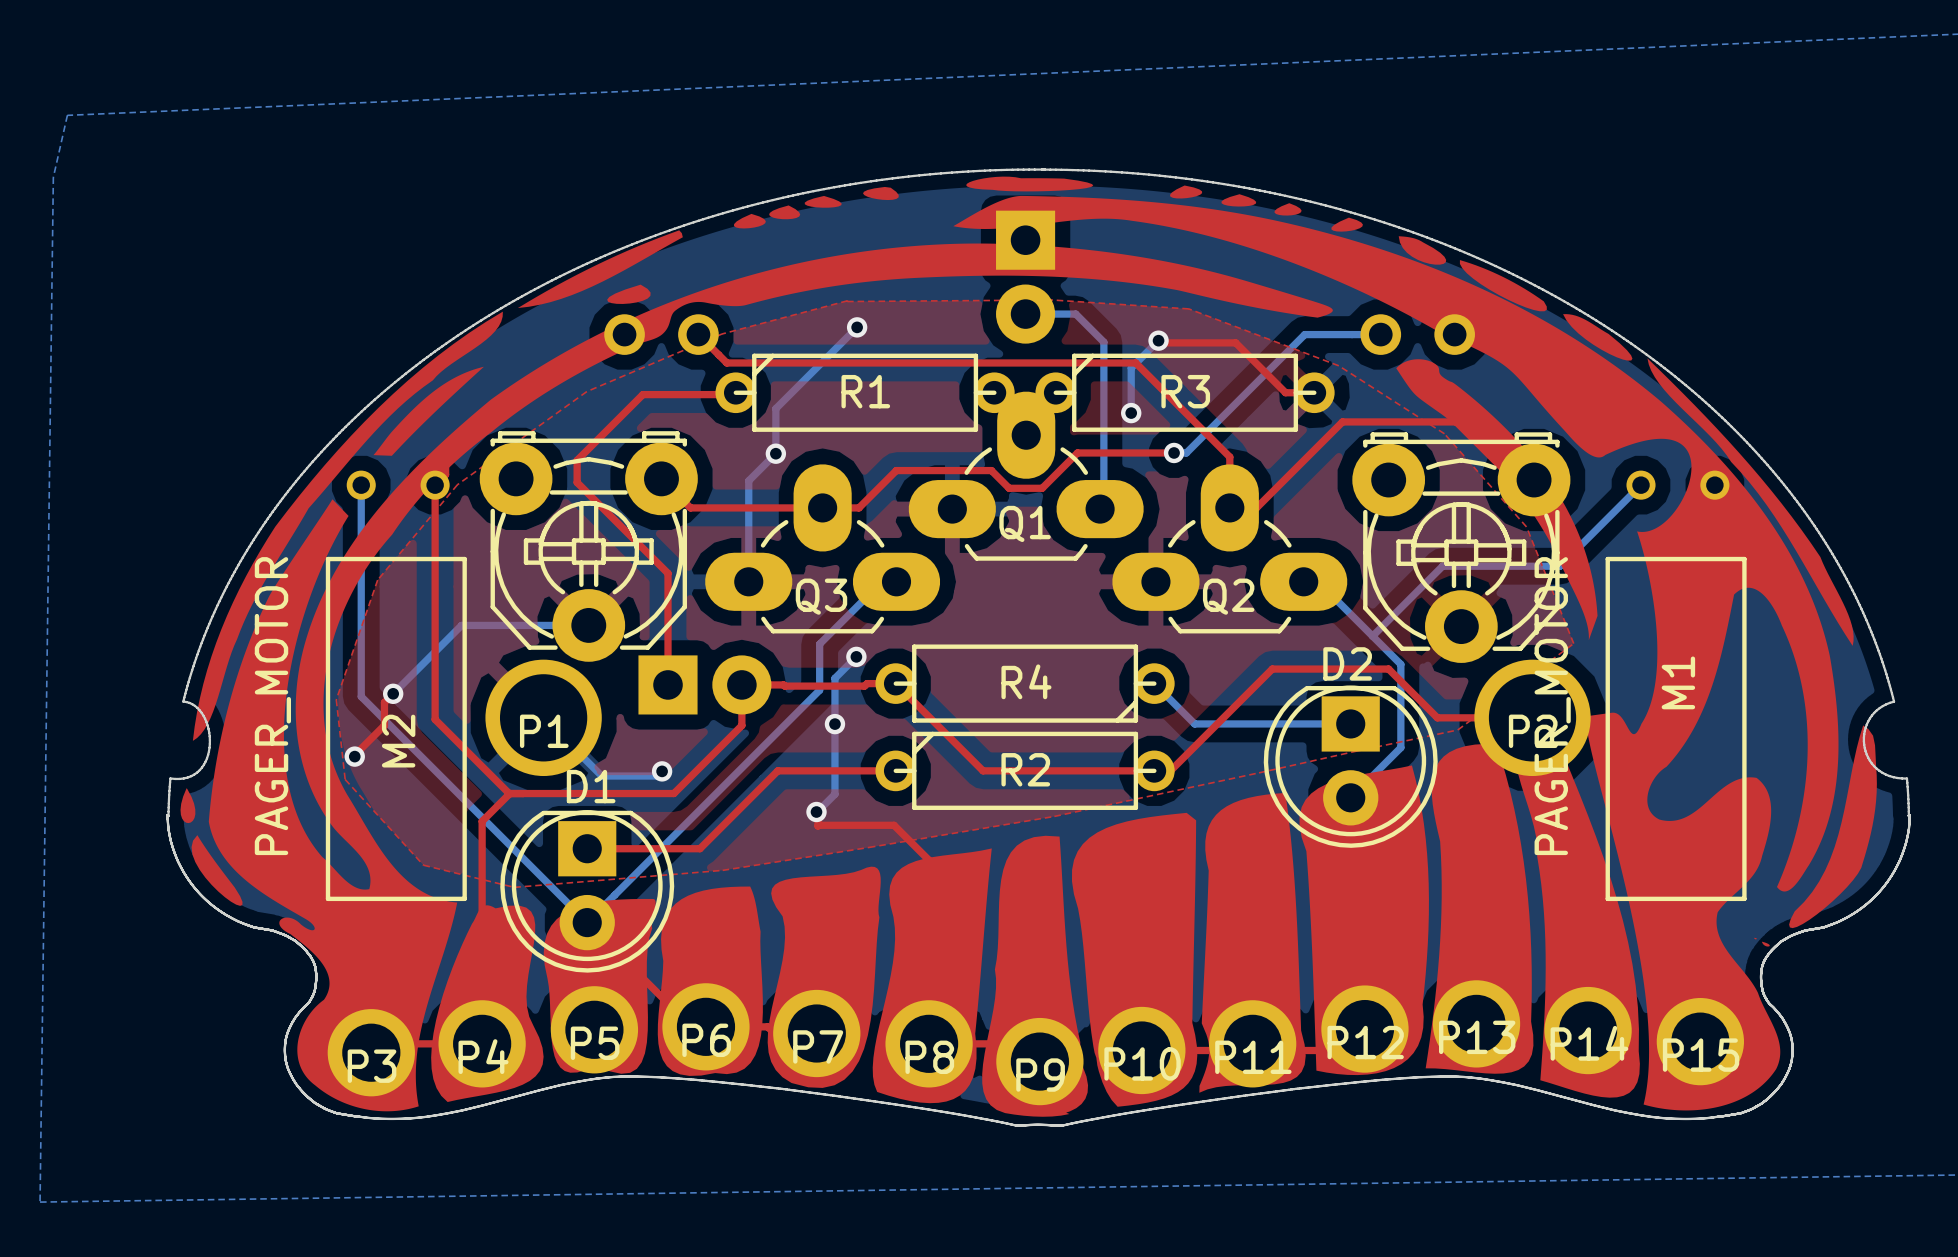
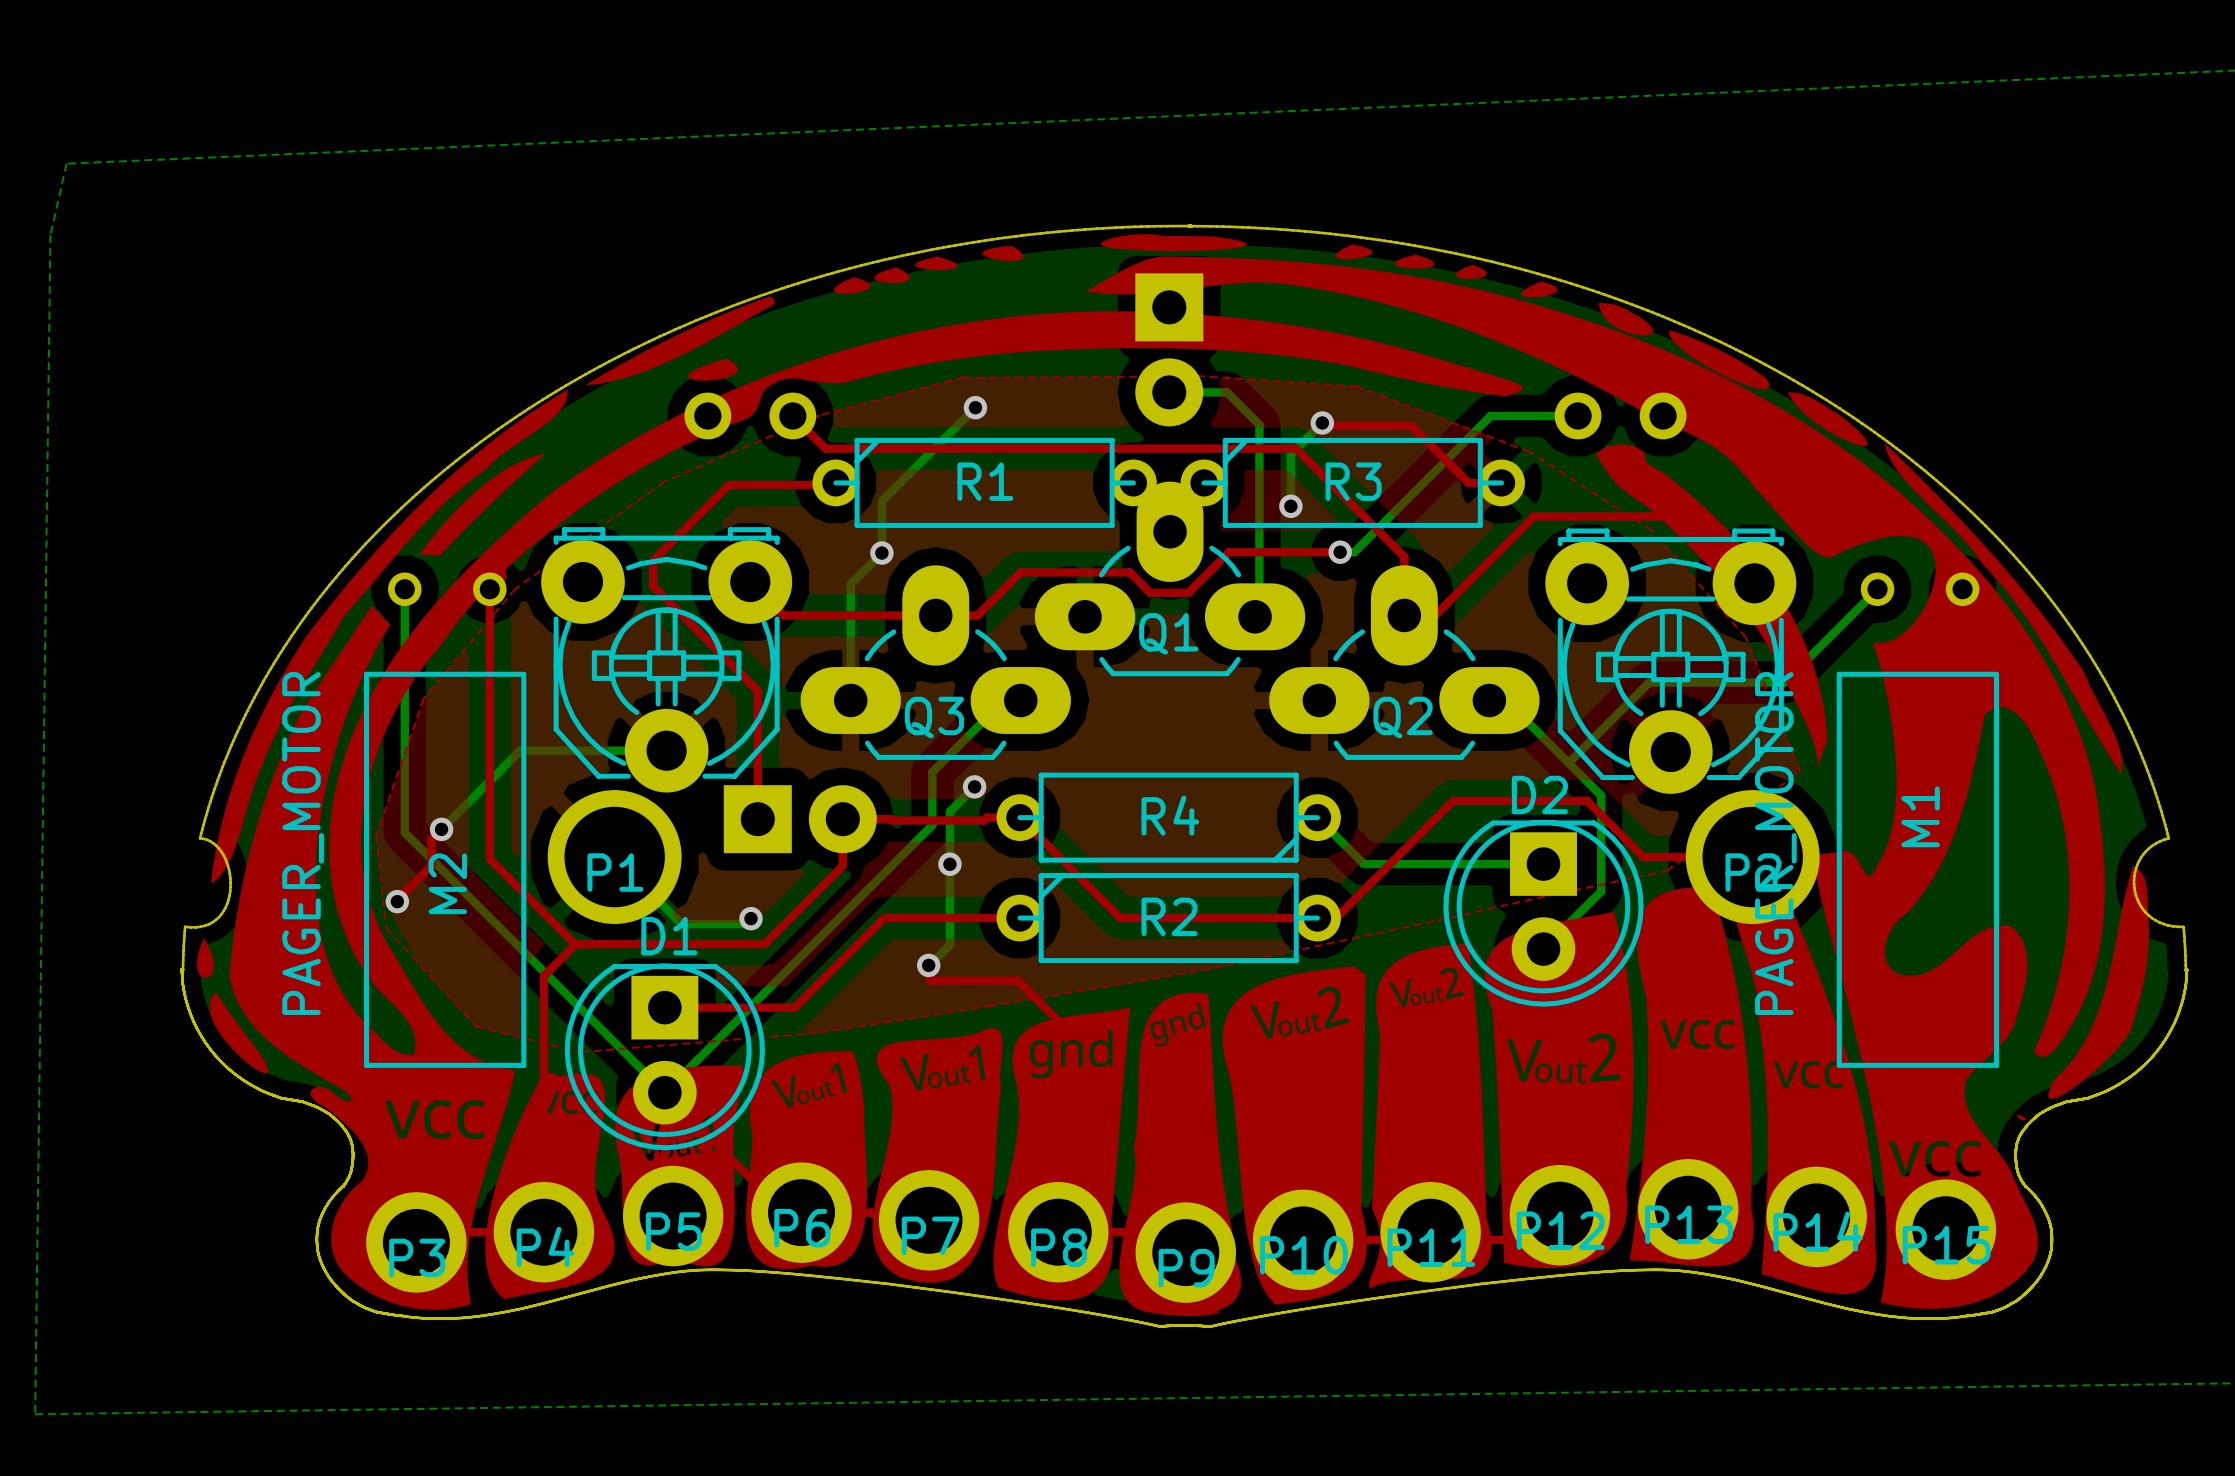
drawing shape: [166, 168, 1911, 1127] -> [180, 224, 2189, 1328]

